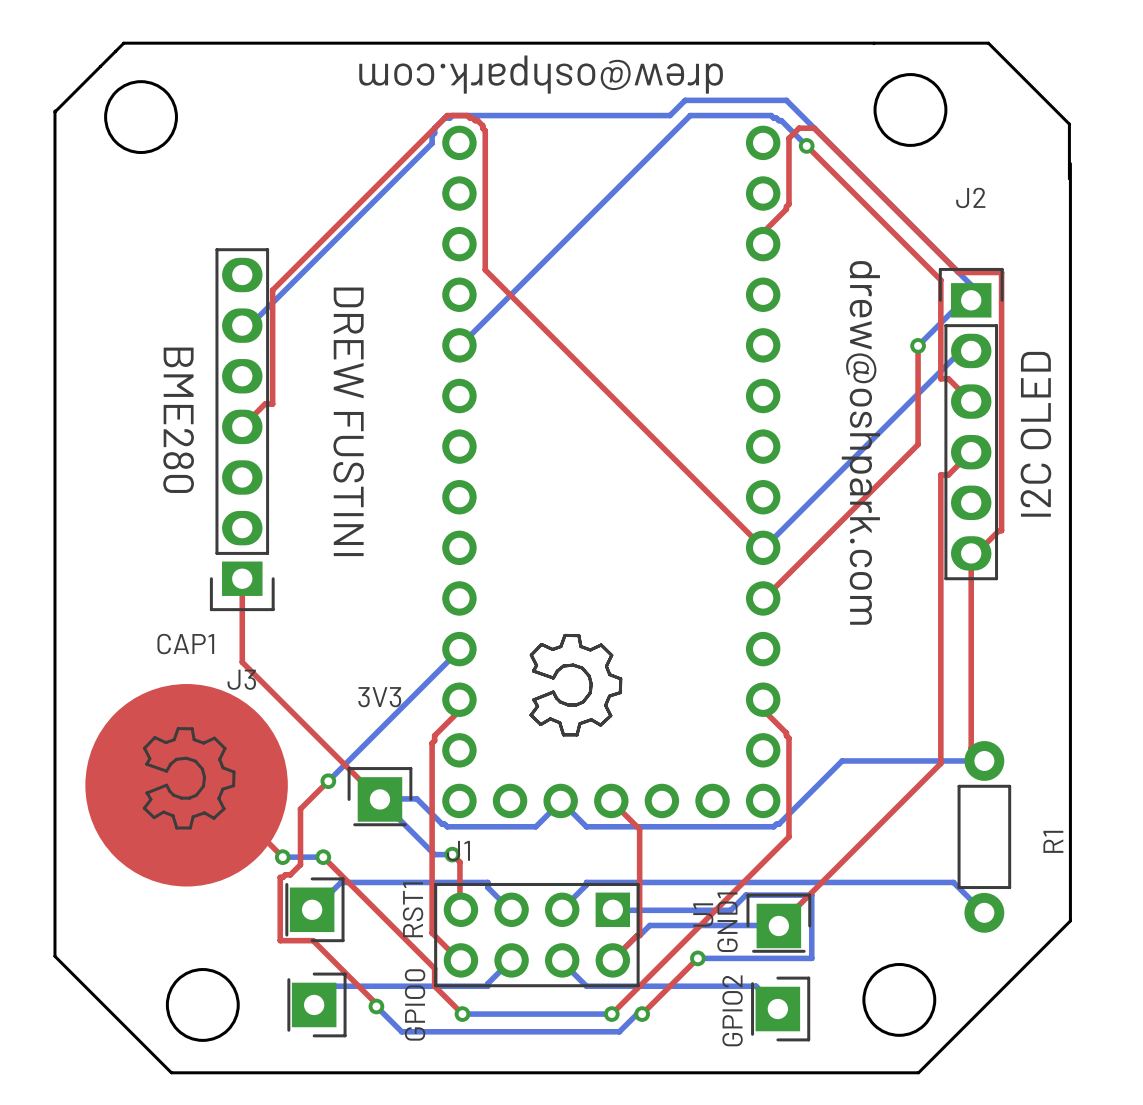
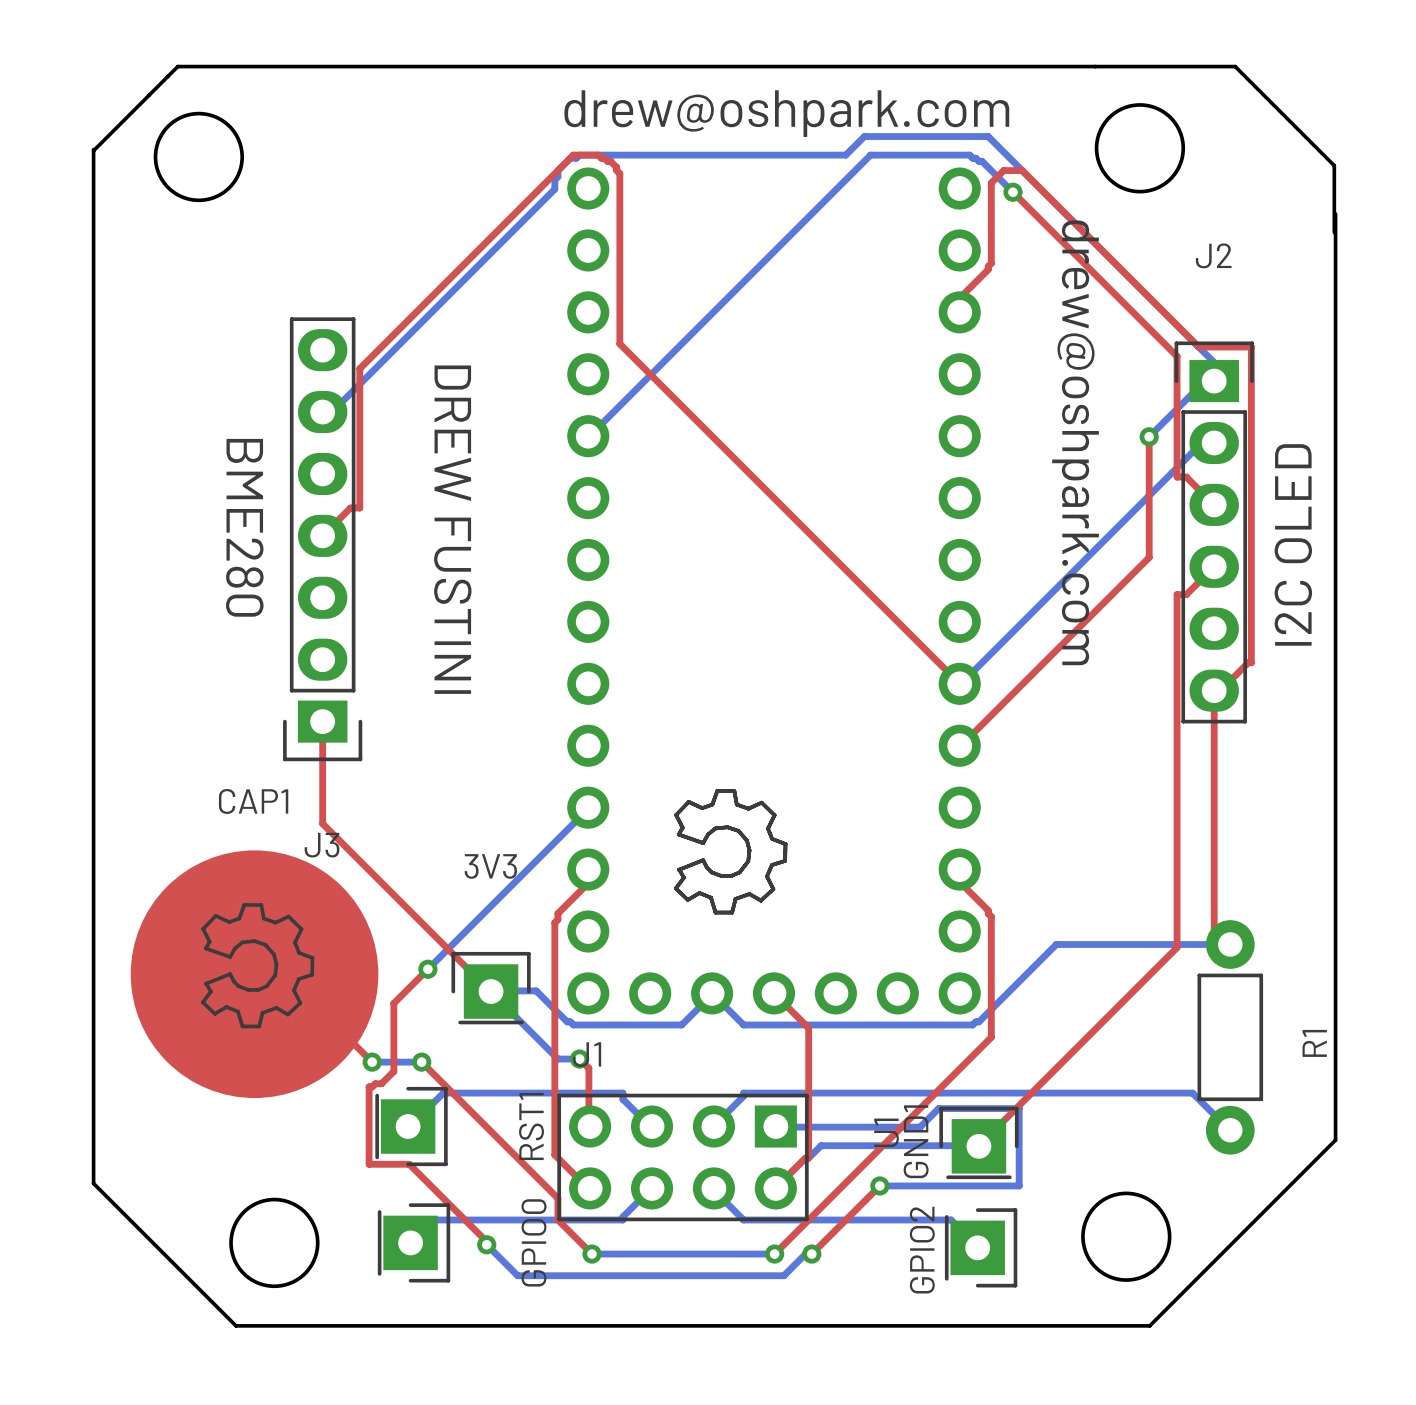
text rotation: 0° (541, 74) -> 180° (786, 113)
text position: drew@oshpark.com (860, 442) -> drew@oshpark.com (1075, 442)

